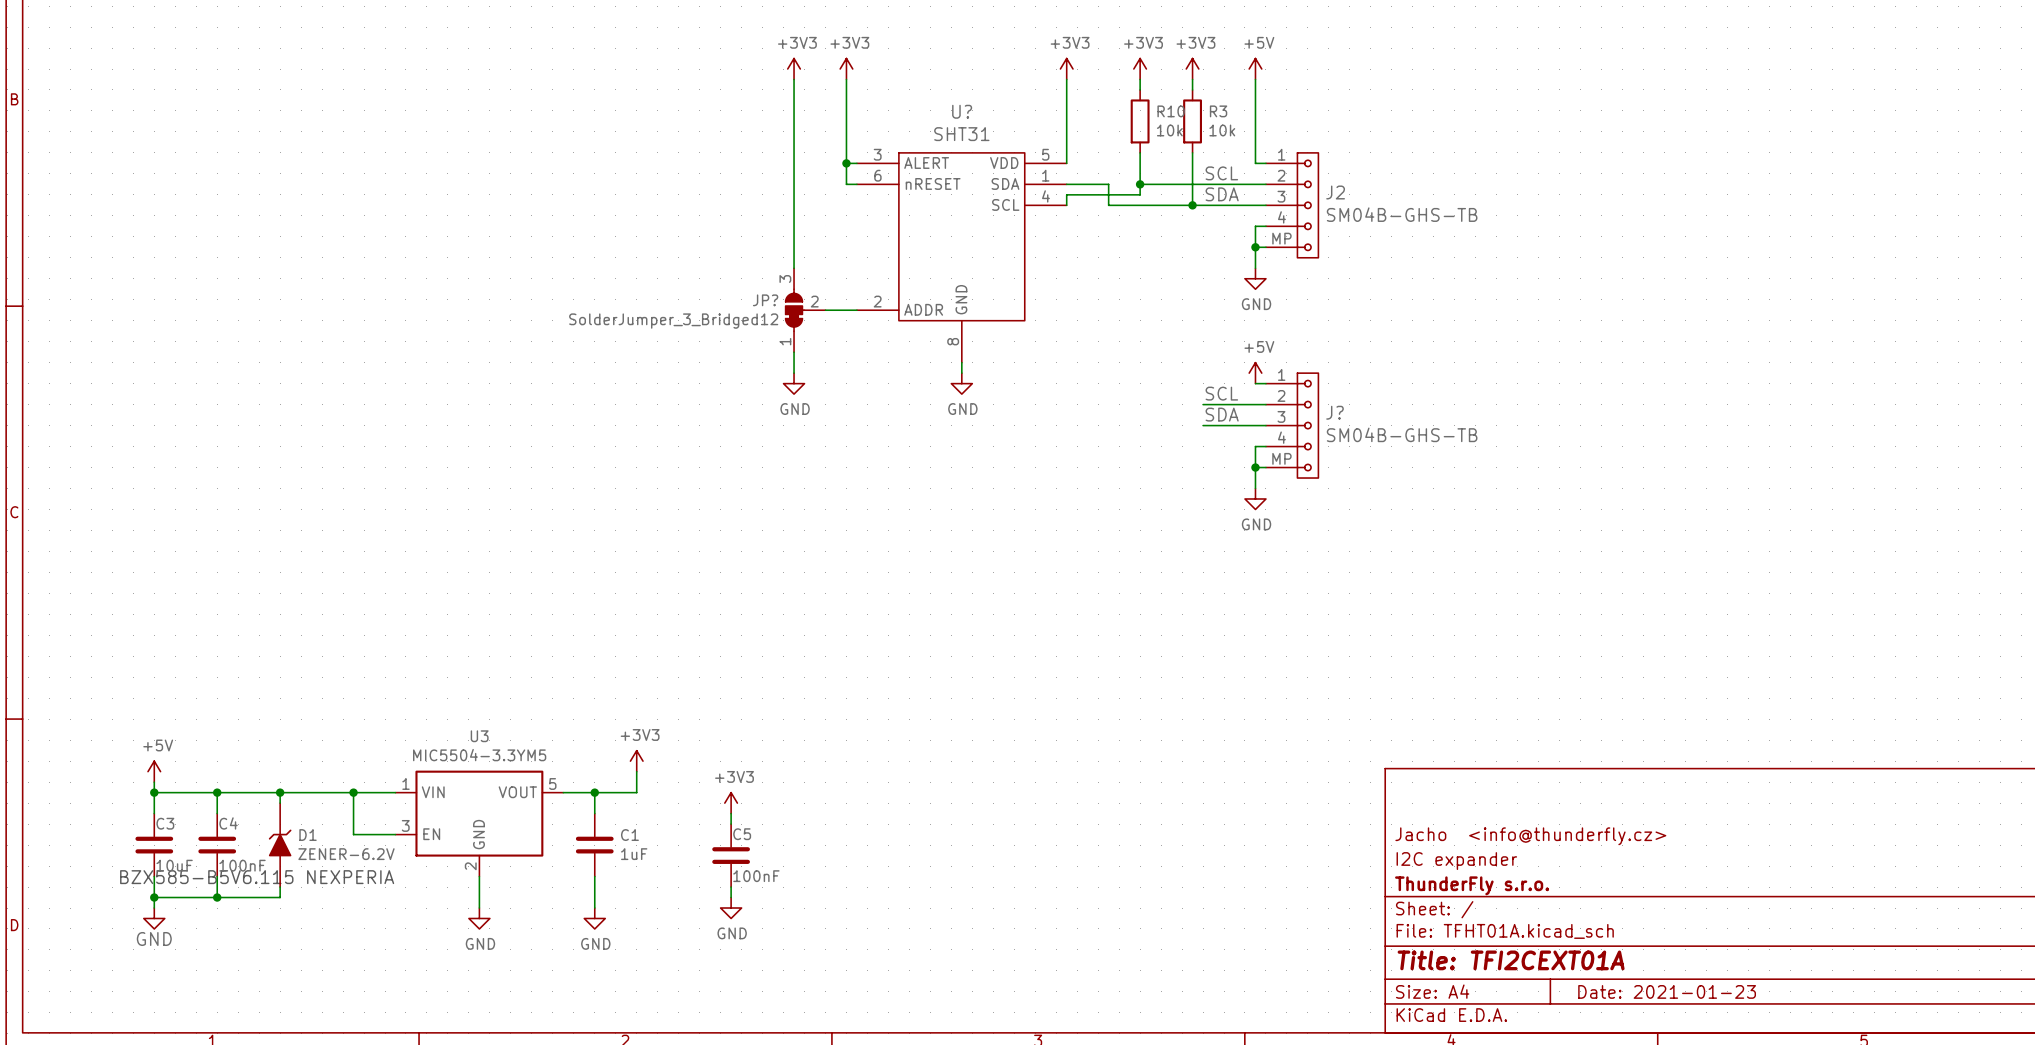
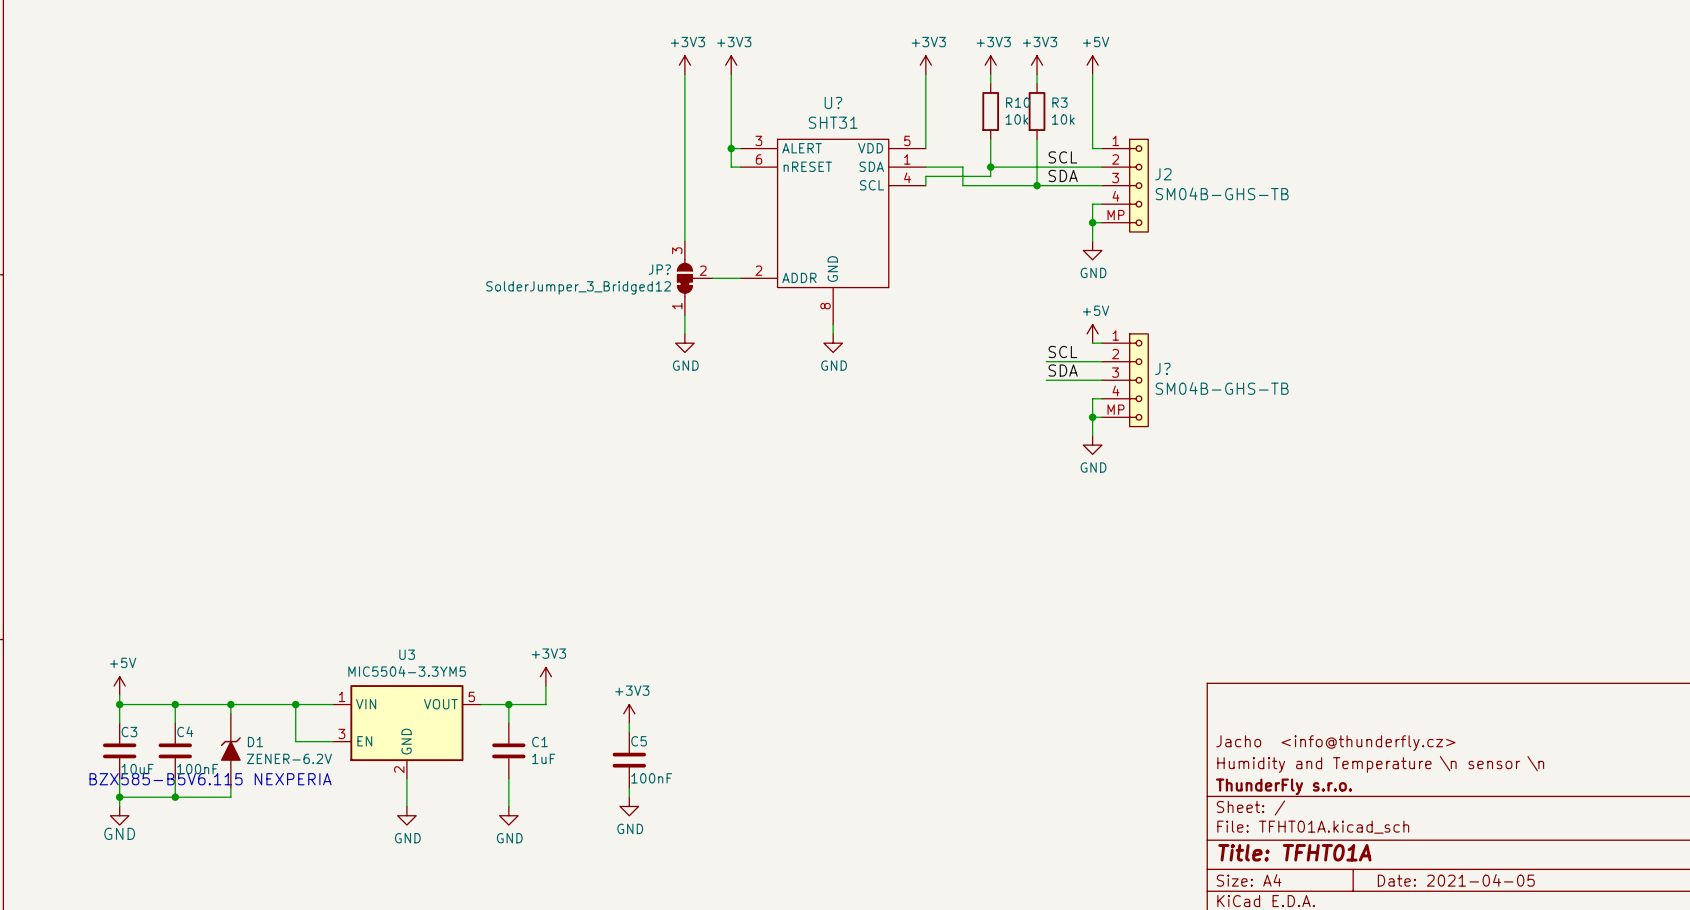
title block: I2C expander (1456, 861) -> Humidity and Temperature \n sensor \n (1380, 764)
title block: Title: TFI2CEXT01A (1511, 960) -> Title: TFHT01A (1294, 852)
title block: Date: 2021-01-23 (1667, 991) -> Date: 2021-04-05 (1456, 880)

